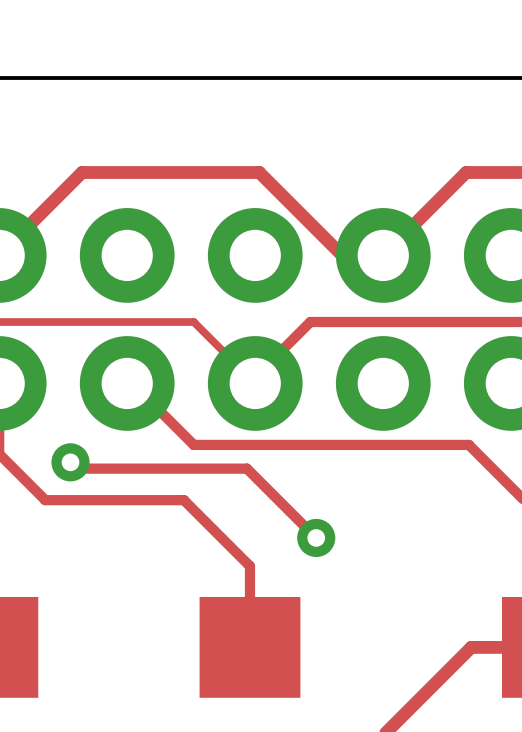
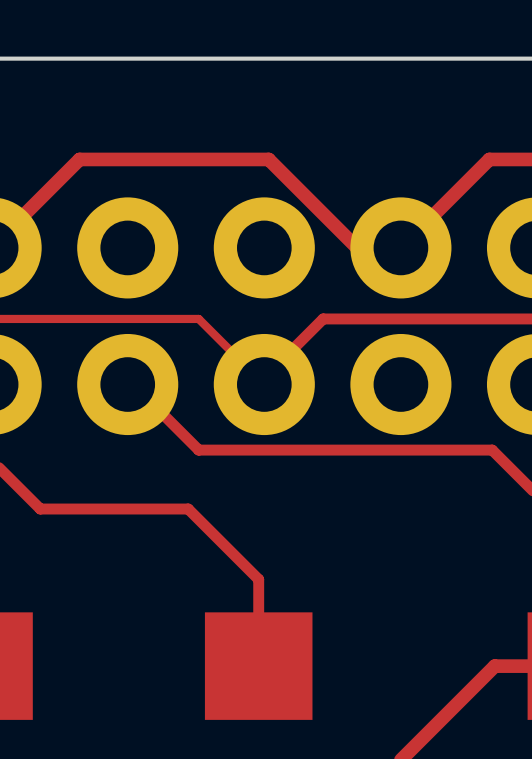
track: (70, 462) (76, 468) (246, 468) (316, 537) -> none
via: (70, 462) -> none
via: (316, 537) -> none

